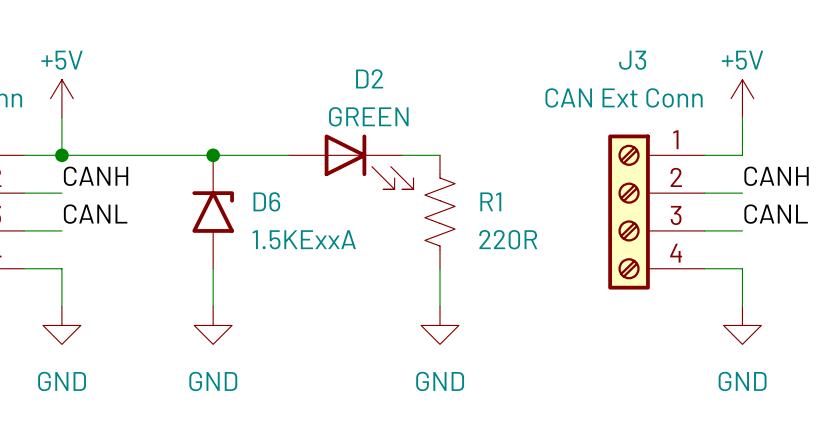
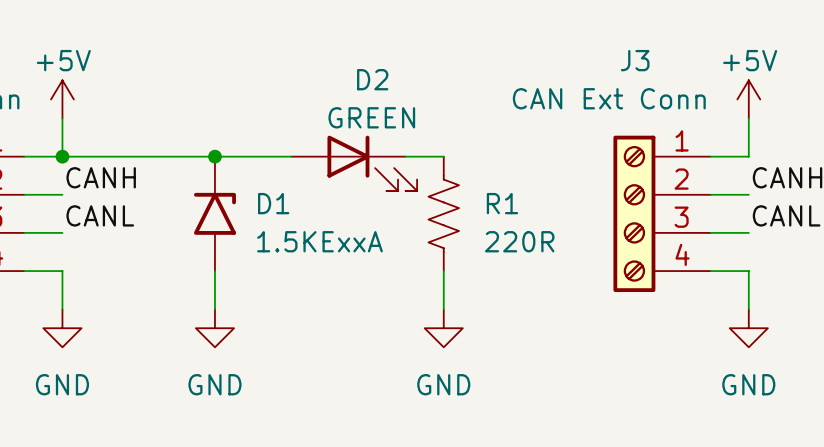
D6 name: D6 (266, 201) -> D1 (273, 203)

